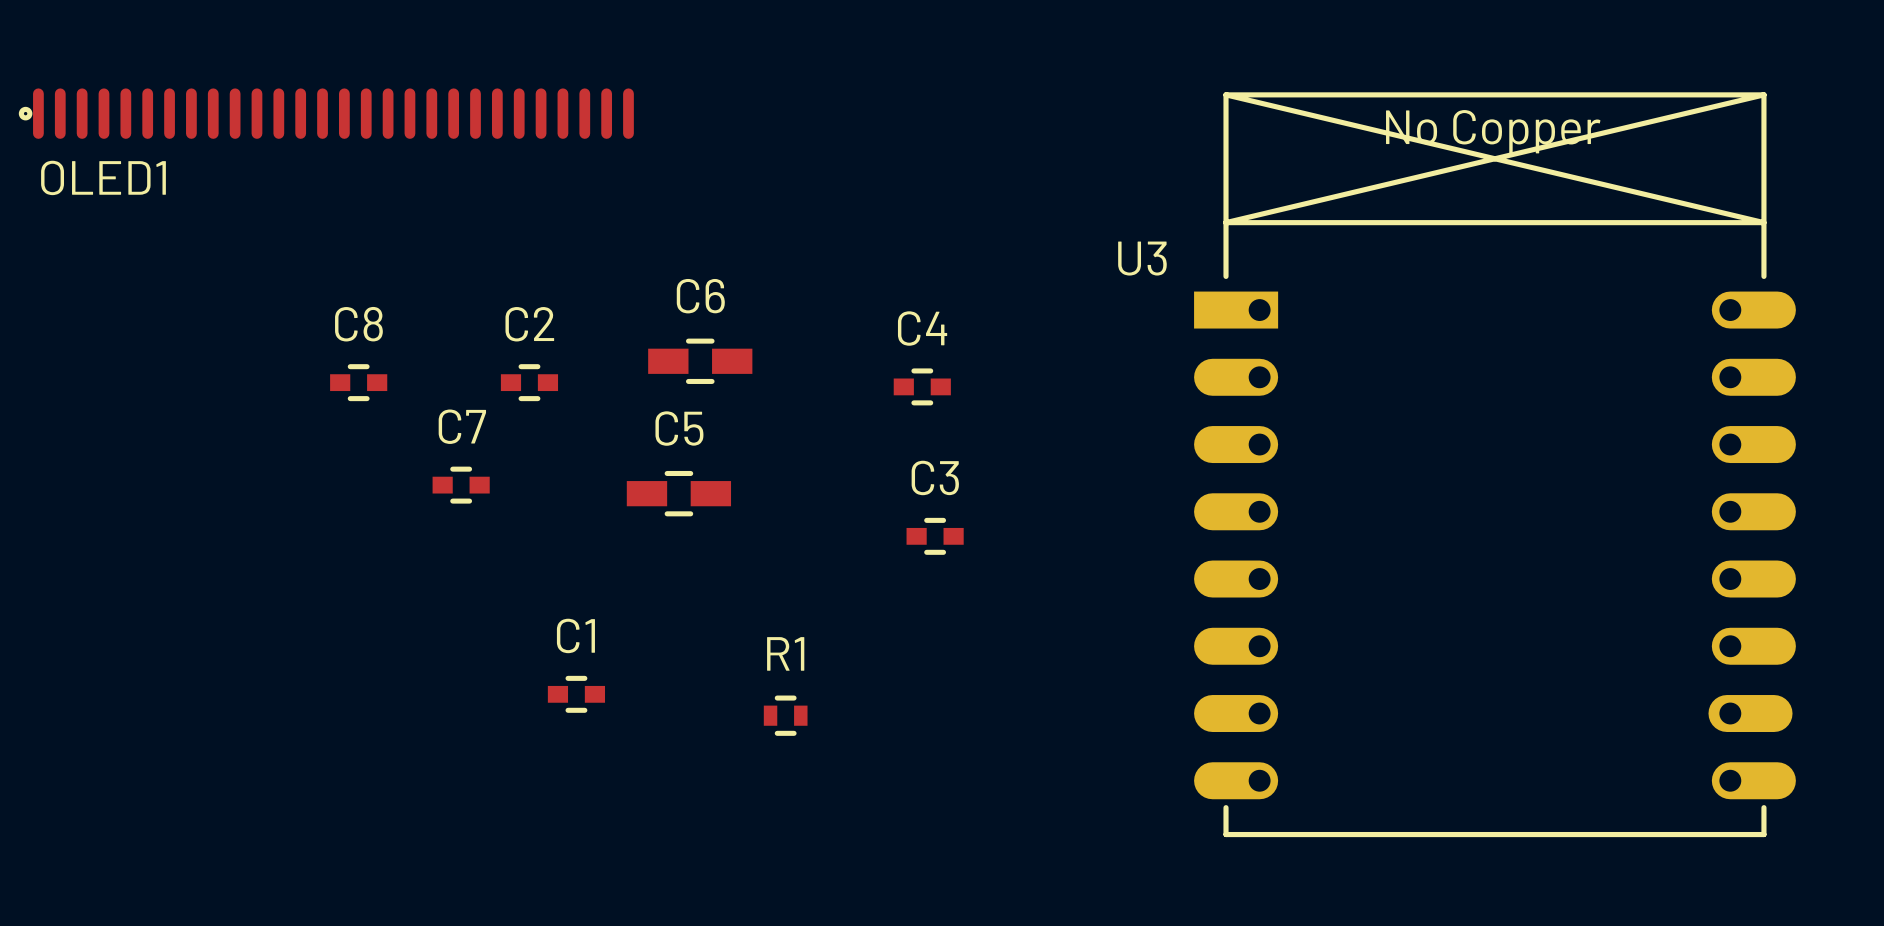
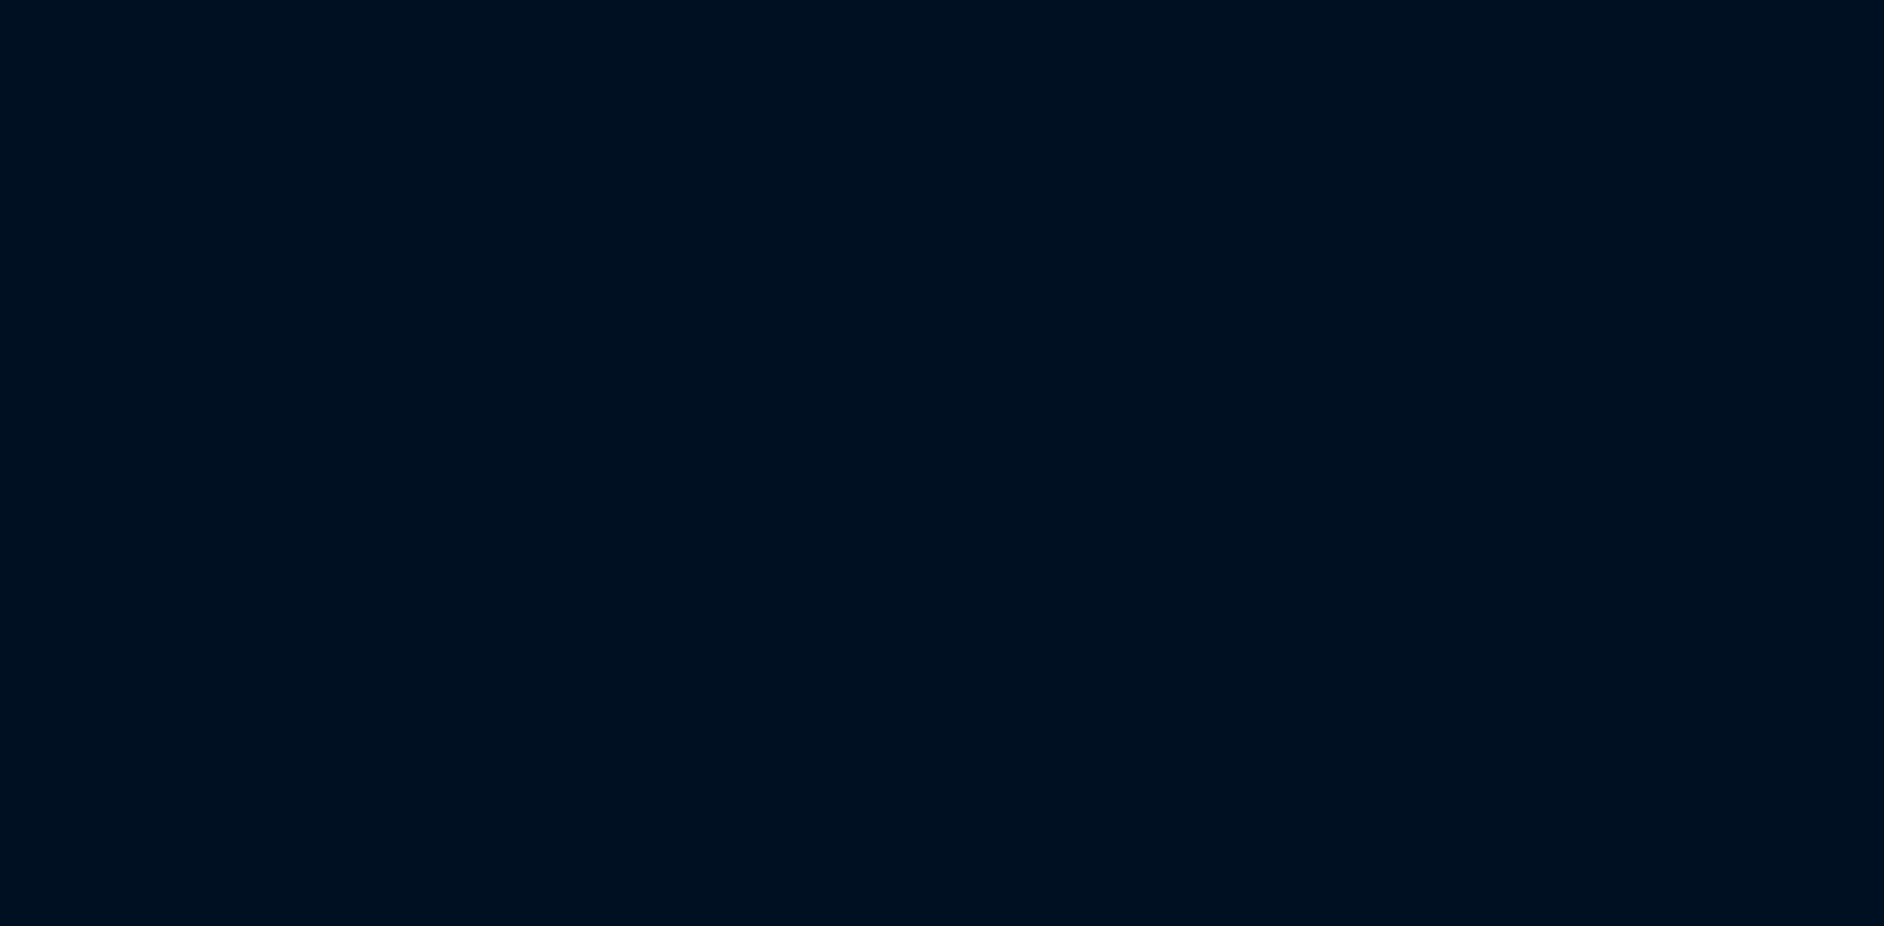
OLED1: (326, 113) -> none
C6: (700, 361) -> none
C8: (358, 382) -> none
C2: (529, 382) -> none
C4: (922, 386) -> none
U3: (1494, 464) -> none
C7: (461, 485) -> none
C5: (678, 493) -> none
C3: (935, 536) -> none
C1: (576, 694) -> none
R1: (785, 715) -> none

